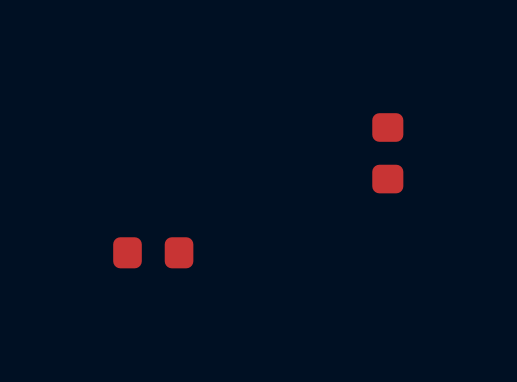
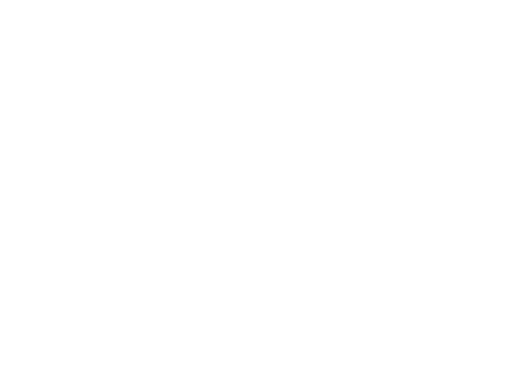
part: (387, 153) -> none
part: (153, 252) -> none

